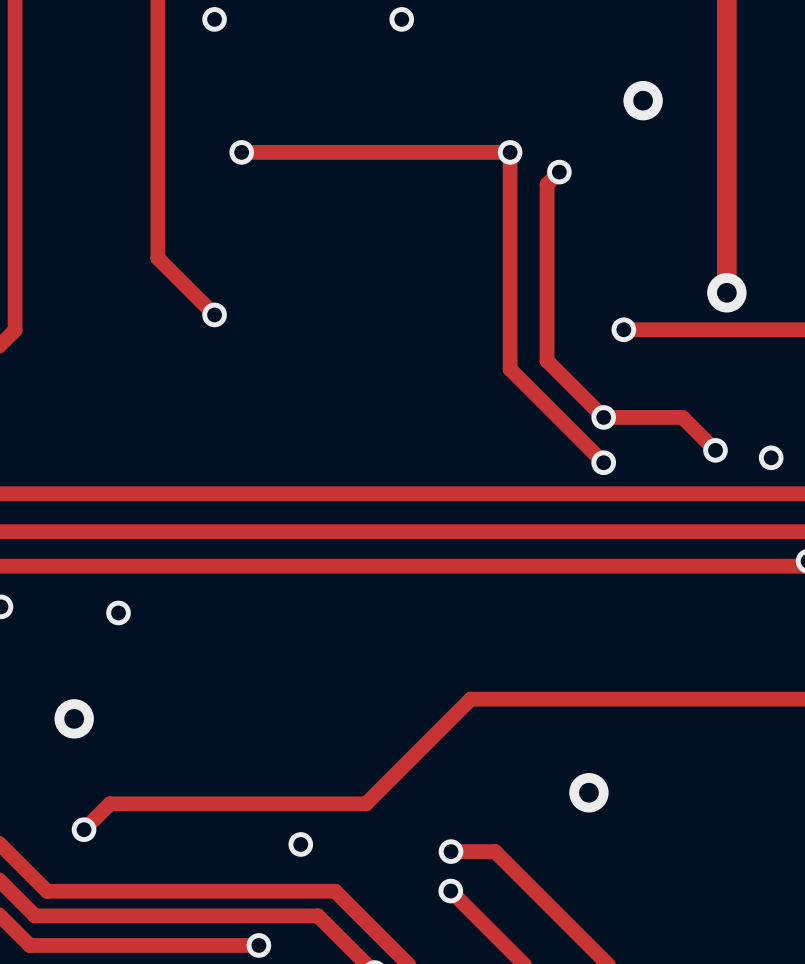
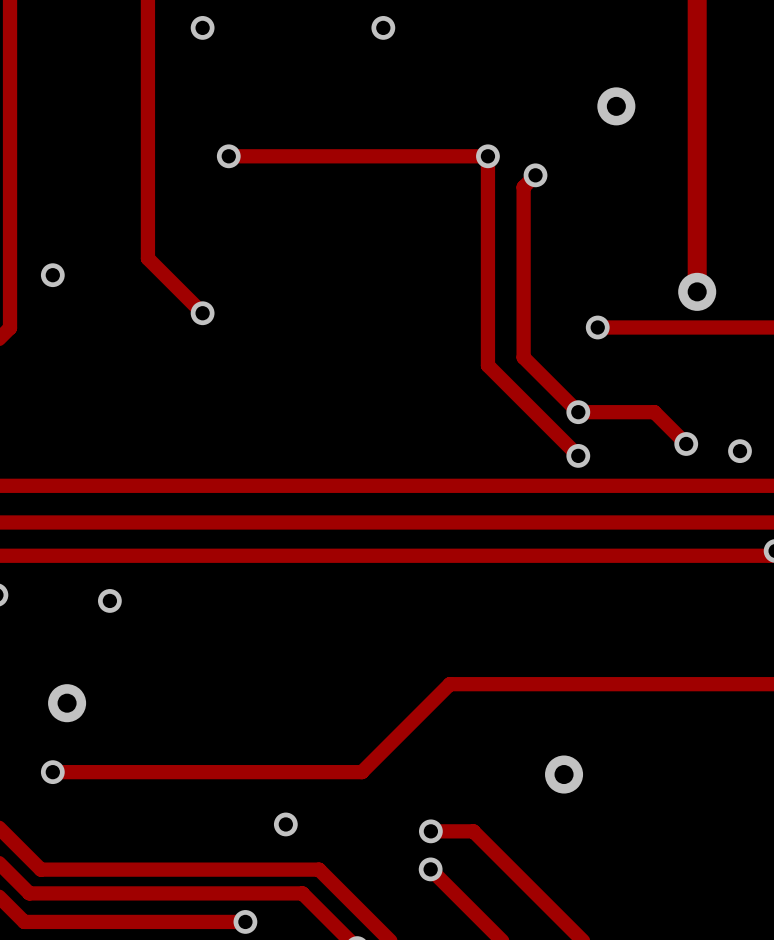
via: none -> (52, 275)
track: (379, 790) (366, 803) (109, 803) (84, 829) -> (361, 772) (52, 772)
via position: (84, 829) -> (52, 772)

